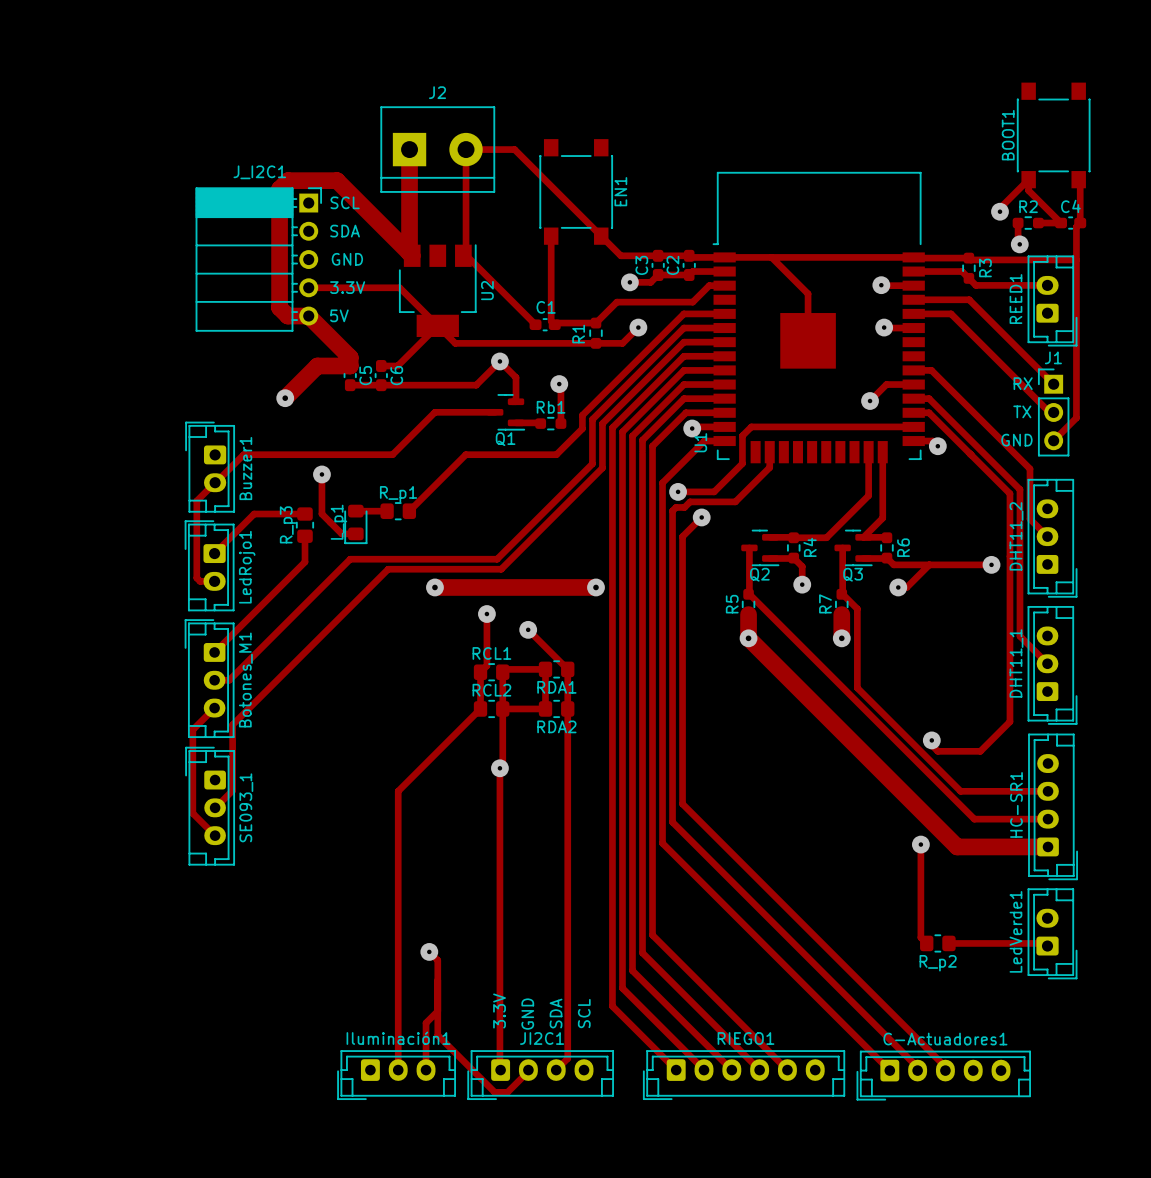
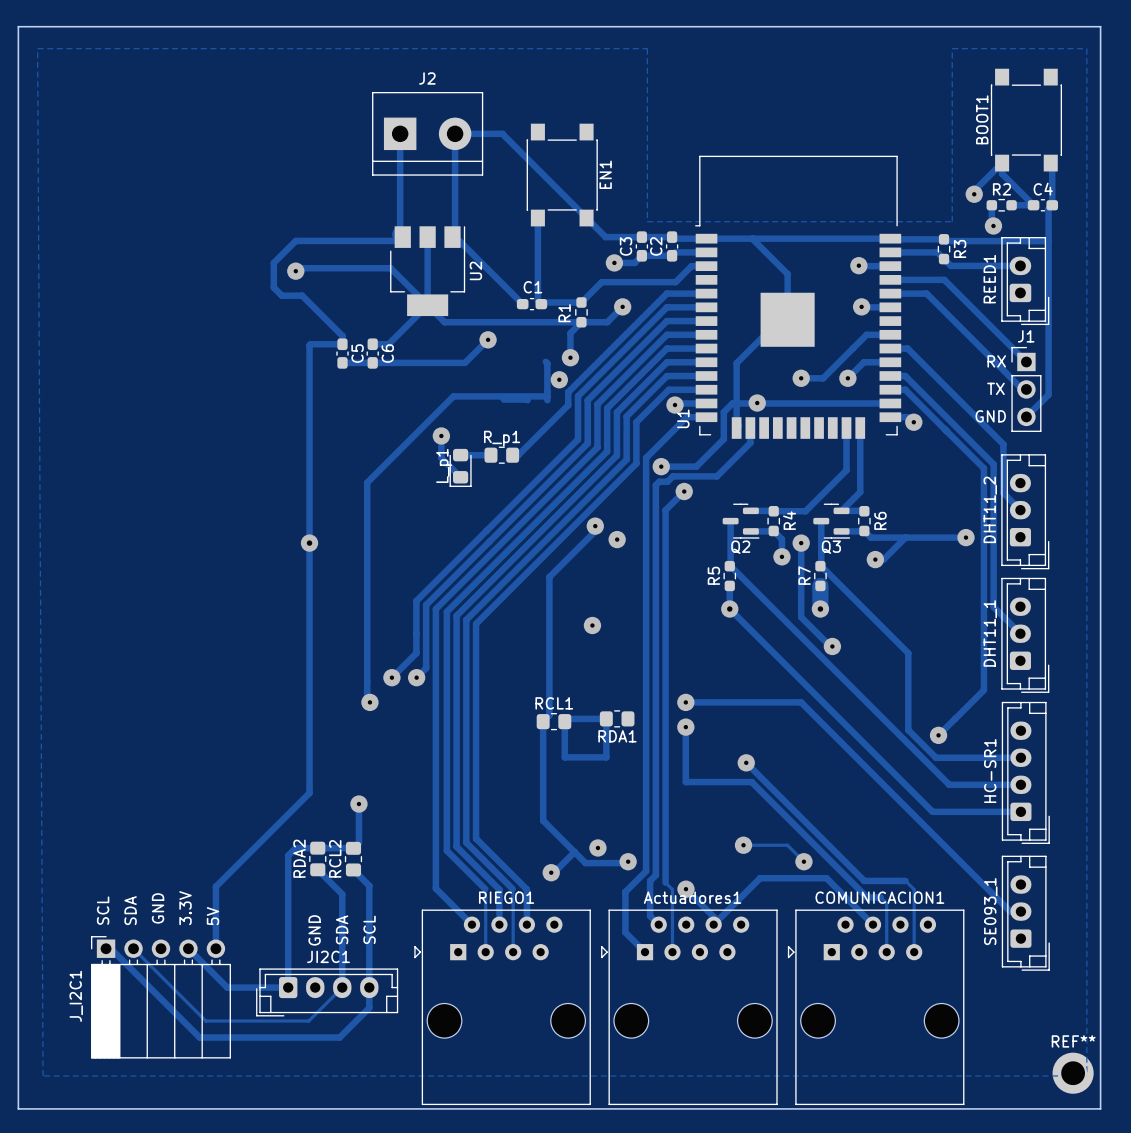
board edge: none -> (18, 26) (1100, 26) (1100, 1108) (18, 1108) (18, 26)
zone outline: none -> (37, 48) (647, 48) (647, 221) (952, 221) (952, 48) (1086, 48) (1086, 1075) (43, 1075) (37, 48)
track width: thick (409, 149) (409, 253) -> thin (400, 133) (400, 234)
text: SCL (345, 202) -> none
text: SDA (345, 231) -> none
track: (409, 253) (337, 180) (288, 180) (279, 189) (279, 282) -> (402, 237) (398, 240) (295, 240) (273, 262)
track: none -> (427, 237) (427, 305)
J_I2C1 rotation: 0° (258, 259) -> 90° counterclockwise (160, 997)
J_I2C1 position: (258, 259) -> (160, 997)
text: GND (347, 259) -> none
track width: thick (279, 282) (279, 307) (287, 316) (308, 316) (350, 357) (350, 365) (316, 367) -> thin (273, 262) (273, 287) (281, 295) (302, 295) (342, 335) (342, 344) (309, 345)
text: 3.3V (347, 287) -> none
via: none -> (295, 271)
text: 5V (339, 315) -> none
track: none -> (787, 319) (780, 319) (736, 363) (736, 428) (739, 425)
track: none -> (581, 322) (570, 333) (570, 357)
track: none -> (890, 334) (866, 334) (823, 378) (801, 378)
track: (499, 361) (516, 377) (516, 401) (511, 401) -> none
track: (316, 367) (285, 398) -> (309, 345) (309, 793) (215, 886) (215, 948)
via: none -> (570, 357)
via: (559, 384) -> none
via: (285, 398) -> none
via: none -> (801, 378)
via: none -> (559, 379)
track: (495, 412) (434, 412) (392, 454) (243, 454) (196, 501) (196, 578) (200, 581) (214, 581) -> none
Q1: (505, 412) -> none
track: none -> (547, 396) (453, 396) (367, 482) (367, 699) (369, 702)
Rb1: (550, 423) -> none
via: none -> (757, 403)
track: (556, 454) (465, 454) (409, 511) -> (543, 430) (518, 455) (512, 455)
track: none -> (441, 435) (441, 458) (460, 477)
via: none -> (441, 435)
Buzzer1: (210, 467) -> none
track: (612, 472) (612, 1006) (676, 1070) -> (597, 447) (435, 609) (435, 888) (471, 924)
track: (321, 474) (321, 514) (341, 533) (355, 533) -> none
via: (321, 474) -> none
track: (622, 476) (622, 988) (704, 1070) -> (607, 451) (446, 611) (446, 850) (485, 889) (485, 952)
track: (632, 480) (632, 970) (731, 1070) -> (616, 455) (456, 615) (456, 846) (499, 889) (499, 924)
track: (642, 484) (642, 952) (759, 1070) -> (626, 459) (466, 619) (466, 842) (512, 889) (513, 952)
track: (652, 488) (652, 935) (787, 1070) -> (636, 463) (476, 623) (476, 838) (526, 889) (526, 924)
track: (355, 511) (387, 511) -> (460, 455) (490, 455)
R_p1 position: (398, 511) -> (501, 455)
track: (305, 514) (254, 514) (214, 553) -> none
L_p1 position: (355, 524) -> (460, 467)
R_p3: (305, 525) -> none
track: (305, 536) (305, 562) (214, 652) -> none
track: none -> (595, 526) (595, 531) (549, 577) (549, 715) (543, 721) (543, 820) (585, 863) (628, 861)
via: none -> (595, 526)
track: (497, 559) (350, 559) (229, 680) (214, 680) -> (485, 532) (416, 601) (416, 653) (391, 677)
LedRojo1: (209, 565) -> none
via: none -> (617, 539)
track: (501, 569) (388, 569) (232, 724) (232, 790) (215, 807) -> (489, 541) (426, 605) (426, 668) (416, 677)
via: none -> (309, 543)
track: none -> (801, 543) (801, 617) (832, 646)
via: none -> (801, 543)
track: (434, 587) (595, 587) -> none
via: (434, 587) -> none
via: (595, 587) -> none
track: (857, 608) (857, 687) (932, 762) -> (835, 580) (908, 653) (908, 730)
track: (486, 614) (486, 665) (480, 672) (480, 708) (398, 791) (398, 1070) -> none
via: (486, 614) -> none
track width: thick (748, 614) (748, 638) (957, 846) (1048, 846) -> thin (729, 585) (729, 609) (932, 811) (1020, 811)
track: (528, 629) (567, 669) (567, 1058) (556, 1070) -> none
via: (528, 629) -> none
via: none -> (592, 625)
RDA1 position: (556, 669) -> (617, 718)
RCL1 position: (491, 672) -> (553, 721)
via: none -> (832, 646)
Botones_M1: (209, 678) -> none
RCL2 name position: RCL2 (491, 690) -> RCL2 (335, 858)
track: (214, 708) (192, 729) (192, 813) (215, 835) -> none
via: none -> (391, 677)
via: none -> (416, 677)
RCL2 rotation: 0° (491, 708) -> 90° clockwise (353, 859)
RCL2 position: (491, 708) -> (353, 859)
track: (502, 708) (545, 708) (545, 669) (505, 669) (502, 672) (502, 765) (499, 768) (500, 1070) -> none
RDA2 rotation: 0° (556, 708) -> 90° clockwise (317, 858)
RDA2 position: (556, 708) -> (317, 858)
via: none -> (369, 702)
track: none -> (685, 702) (801, 702) (1010, 911) (1020, 911)
via: none -> (685, 702)
track: (931, 740) (931, 745) (937, 751) (980, 751) -> (938, 735) (955, 718)
via position: (931, 740) -> (938, 735)
track: none -> (567, 718) (564, 721) (564, 757) (606, 757) (606, 718) (567, 718)
track: none -> (685, 727) (685, 782) (751, 782) (867, 897) (880, 897) (886, 903) (886, 952)
via: none -> (685, 727)
via: (499, 768) -> none
track: none -> (746, 762) (864, 880) (905, 880) (914, 889) (914, 952)
via: none -> (746, 762)
track: (682, 803) (945, 1066) (945, 1070) -> (665, 770) (665, 882) (672, 889) (672, 952)
SE093_1 rotation: 0° (210, 806) -> 180° (1025, 913)
SE093_1 position: (210, 806) -> (1025, 913)
track: (672, 822) (917, 1067) (917, 1070) -> (655, 787) (655, 875) (650, 880) (650, 916) (658, 924)
track: none -> (358, 804) (358, 842) (353, 848) (295, 848) (288, 855) (288, 987) (227, 987) (188, 948)
via: none -> (358, 804)
track: (662, 843) (889, 1070) -> (646, 808) (646, 871) (625, 891) (625, 932) (645, 952)
track: (920, 844) (920, 937) (926, 943) -> none
via: (920, 844) -> none
track: none -> (743, 845) (787, 845) (803, 861)
via: none -> (743, 845)
via: none -> (597, 847)
track: none -> (574, 852) (553, 872) (551, 872)
via: none -> (628, 861)
via: none -> (803, 861)
track: none -> (317, 869) (342, 894) (342, 987) (308, 1021) (205, 1021) (133, 948)
track: none -> (353, 869) (369, 885) (369, 1007) (339, 1037) (199, 1037) (110, 948) (106, 948)
via: none -> (551, 872)
track: none -> (685, 889) (713, 916) (713, 924) (760, 878) (826, 878) (872, 924)
via: none -> (685, 889)
LedVerde1: (1052, 933) -> none
R_p2: (937, 943) -> none
track: (948, 943) (1044, 943) (1047, 946) -> none
text: none -> GND (158, 908)
text: none -> 3.3V (185, 908)
text: none -> SCL (103, 910)
text: none -> SDA (130, 910)
track: (429, 951) (437, 960) (437, 1035) (494, 1092) (507, 1092) (528, 1071) (528, 1068) -> none
via: (429, 951) -> none
text: none -> 5V (212, 916)
text: none -> GND (314, 930)
text: 3.3V (499, 1010) -> none
track: (437, 1011) (426, 1023) (426, 1070) -> none
text position: SDA (556, 1013) -> SDA (342, 929)
text position: SCL (584, 1013) -> SCL (369, 929)
text: GND (527, 1014) -> none
RIEGO1 name position: RIEGO1 (745, 1038) -> RIEGO1 (506, 897)
Actuadores1: none -> (689, 1007)
COMUNICACION1: none -> (876, 1007)
RIEGO1 footprint: [643, 1050, 845, 1100] -> [414, 909, 591, 1106]
Iluminación1: (396, 1075) -> none
JI2C1 position: (540, 1075) -> (327, 992)
C-Actuadores1: (943, 1075) -> none
REF**: none -> (1073, 1073)

